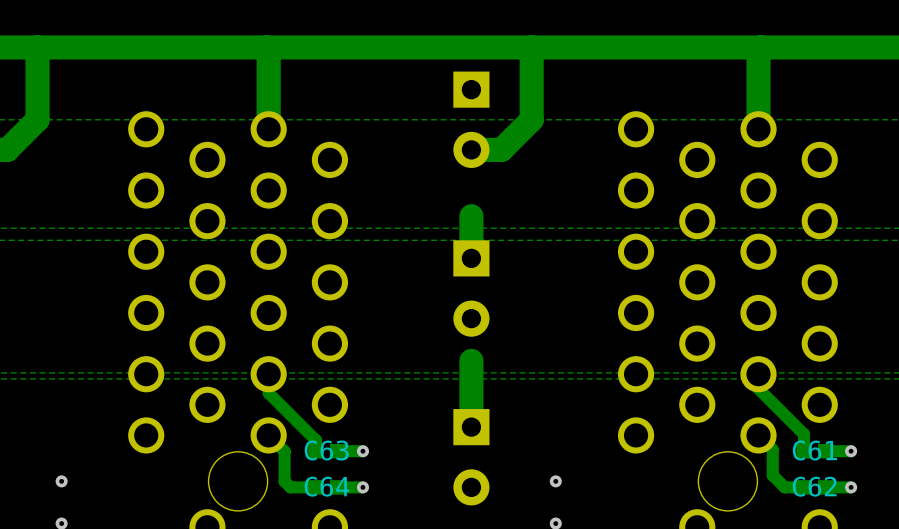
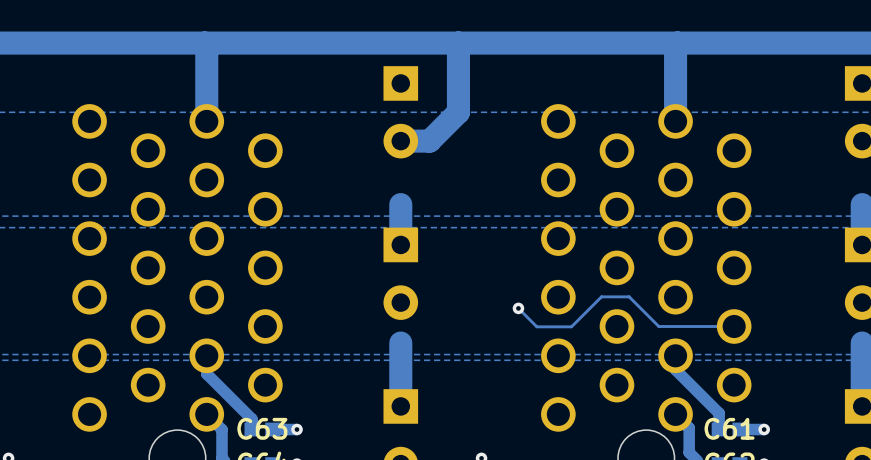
track: none -> (518, 308) (536, 326) (571, 326) (601, 296) (629, 296) (658, 326) (734, 326)
via: none -> (518, 308)

